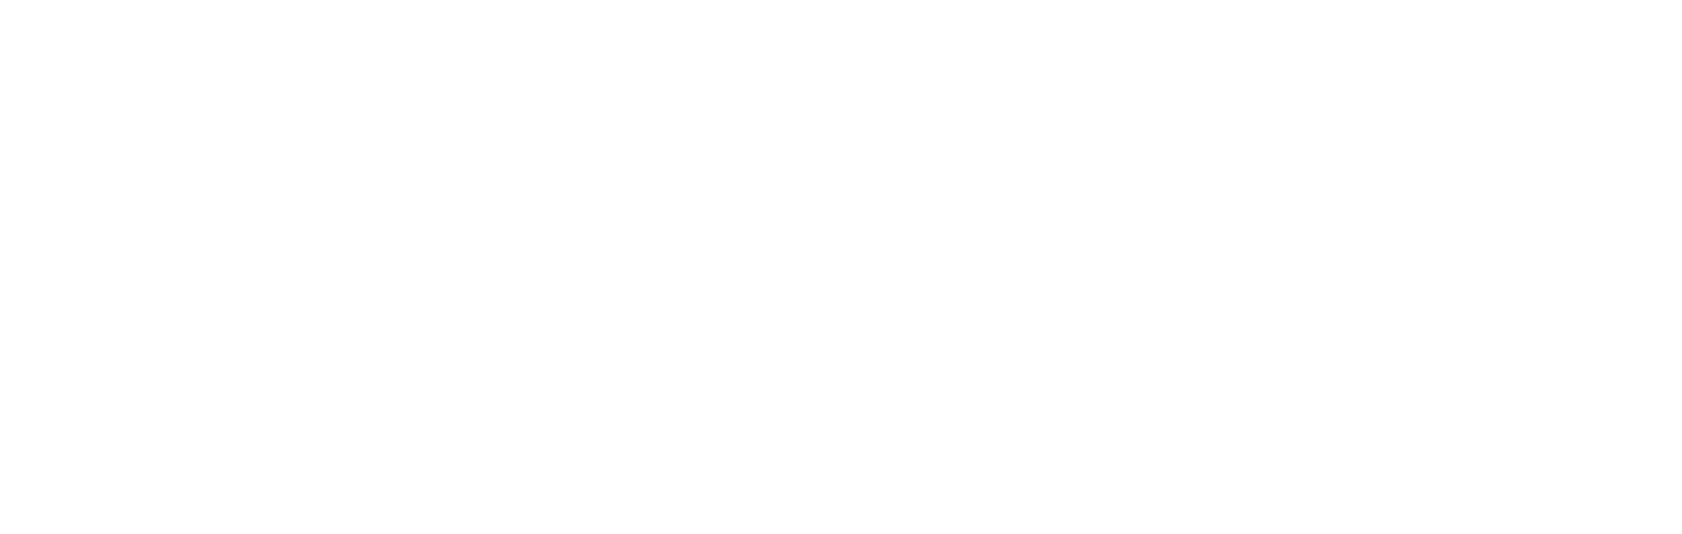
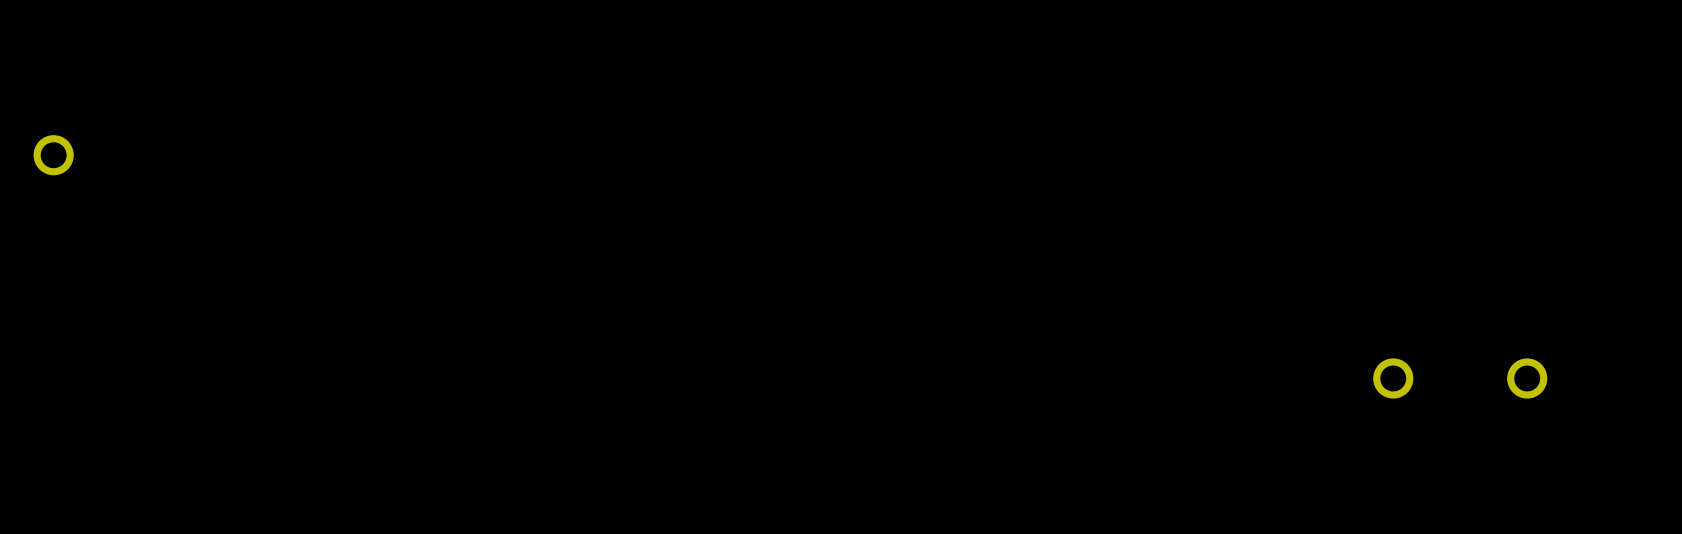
part: none -> (53, 155)
part: none -> (1393, 378)
part: none -> (1527, 378)

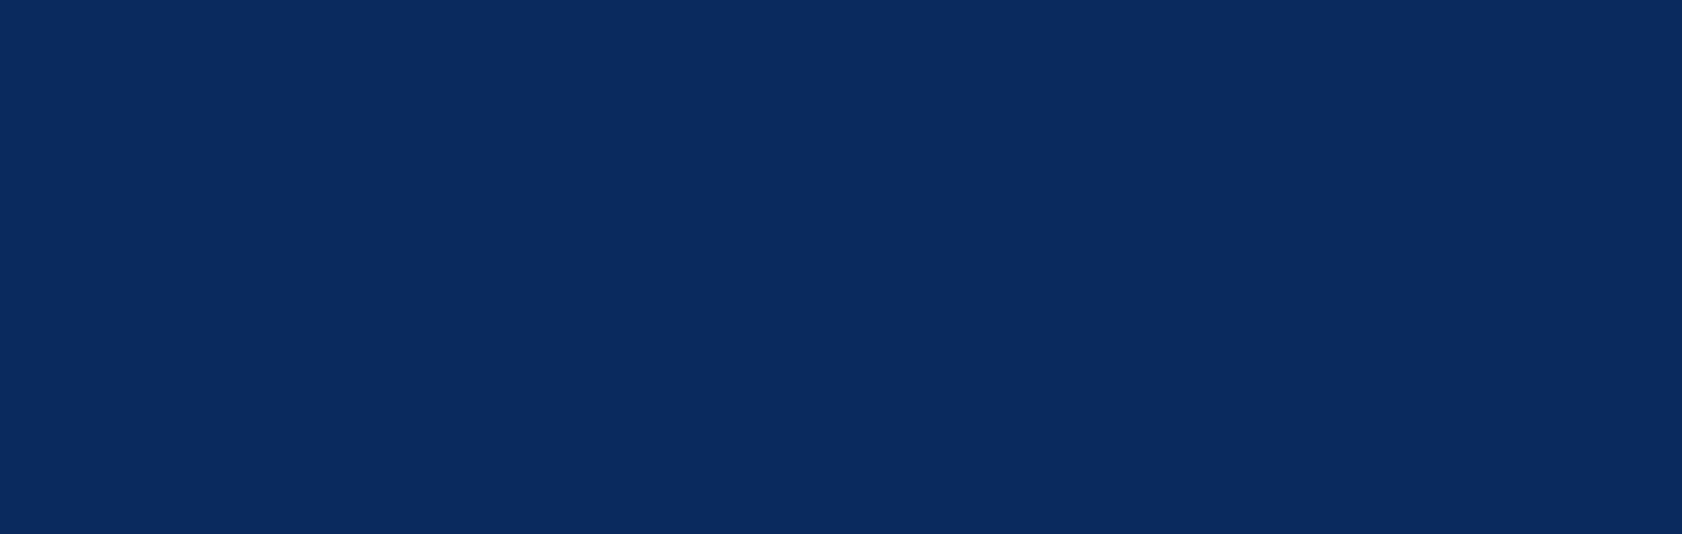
part: (53, 155) -> none
part: (1393, 378) -> none
part: (1527, 378) -> none

